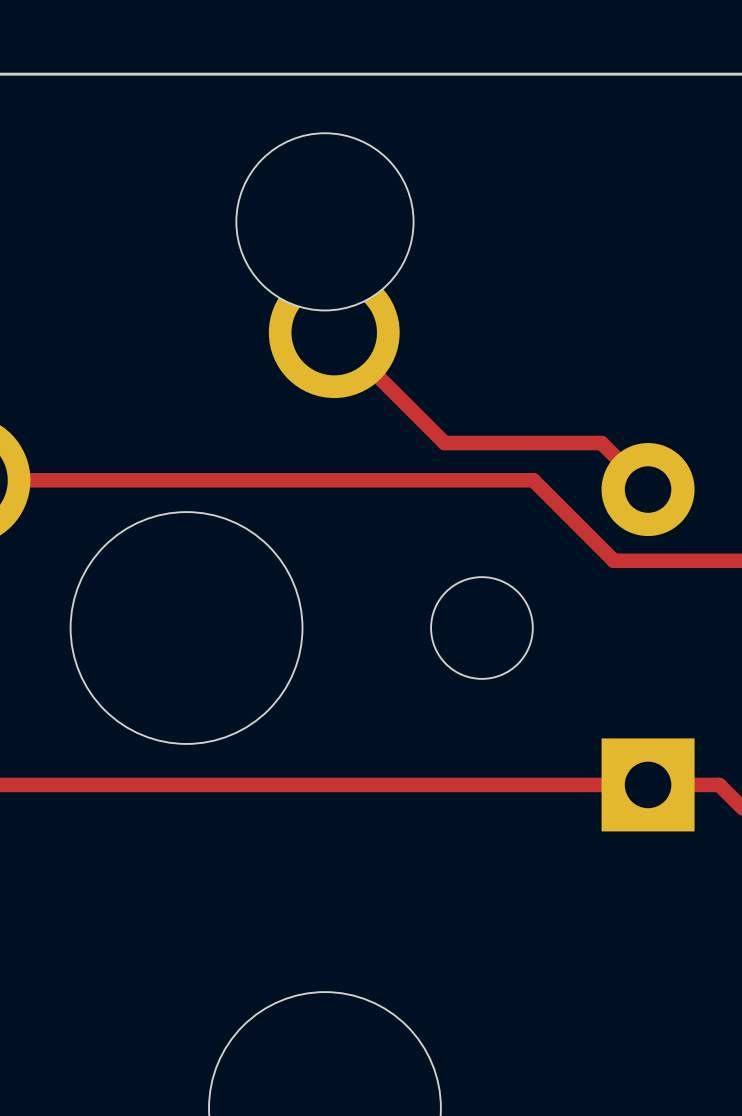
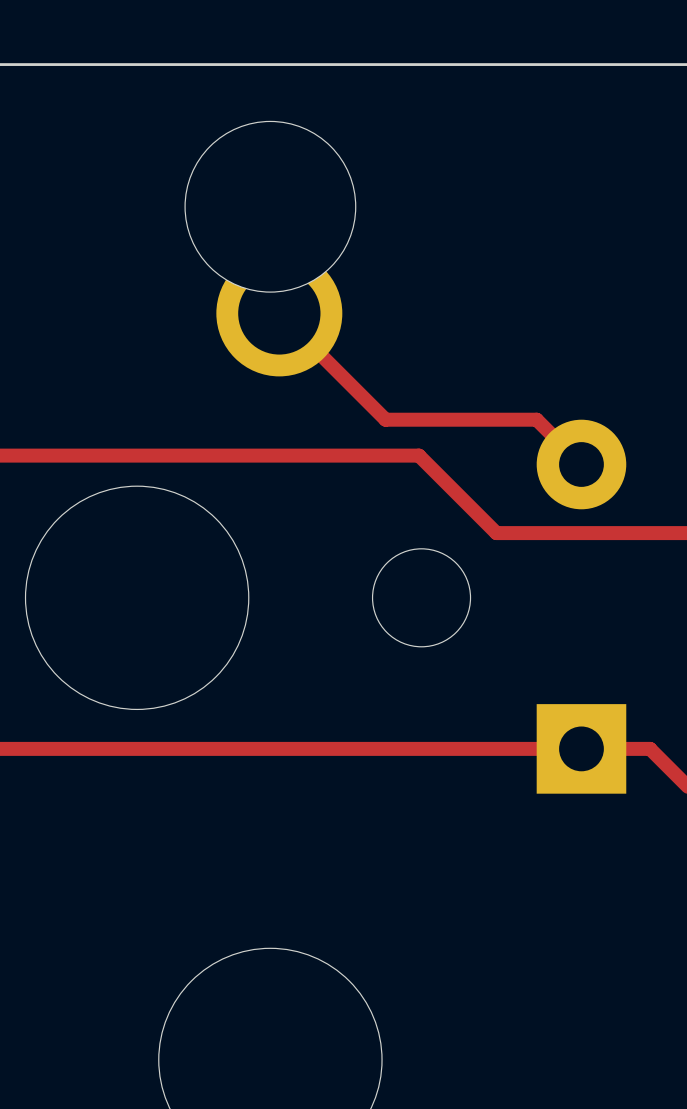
track: (479, 480) (533, 480) (613, 560) -> (418, 455) (496, 533) (548, 533)

